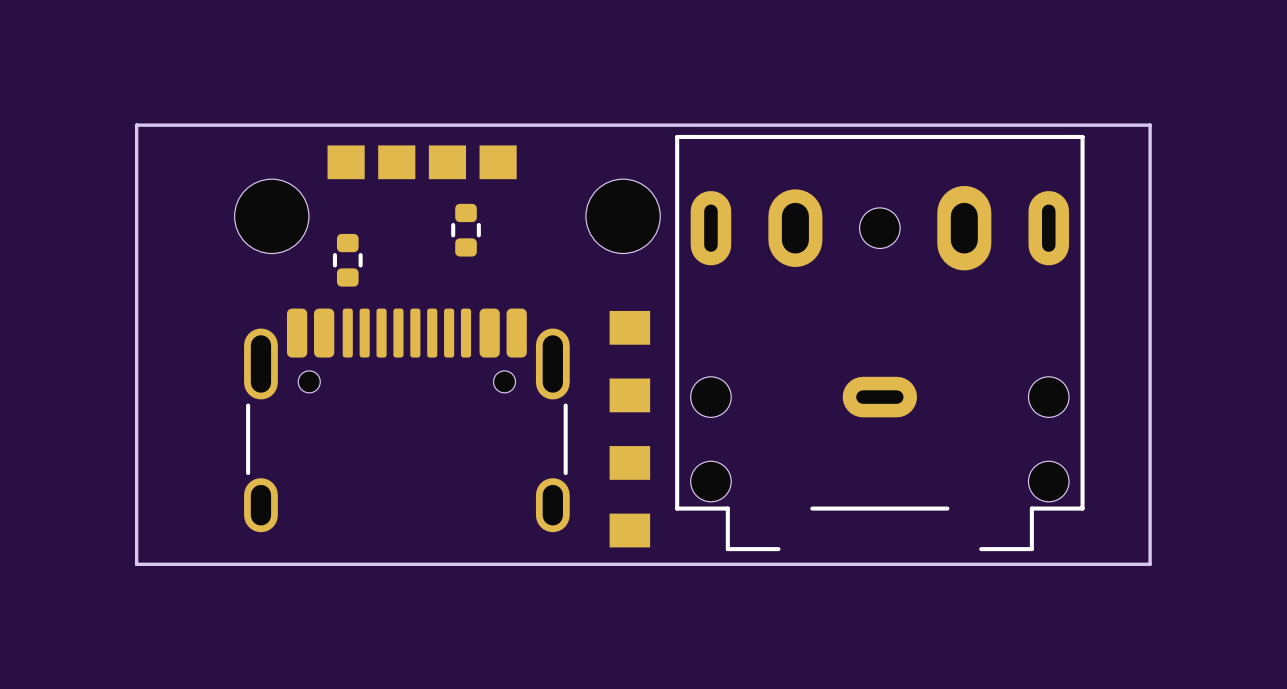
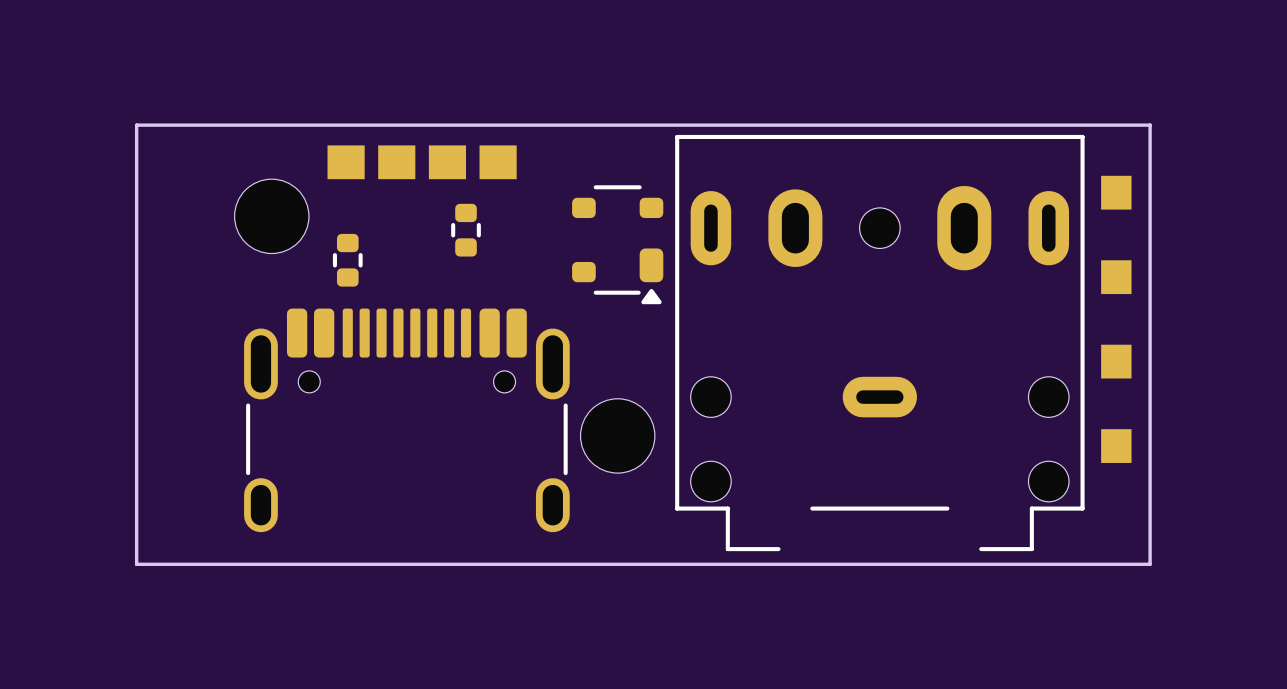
part footprint: [585, 179, 661, 254] -> [572, 185, 664, 305]
part: none -> (1116, 192)
part: none -> (1116, 277)
part: (629, 327) -> none
part: none -> (1116, 361)
part: (629, 395) -> none
part: none -> (617, 435)
part: none -> (1116, 446)
part: (629, 462) -> none
part: (629, 530) -> none

